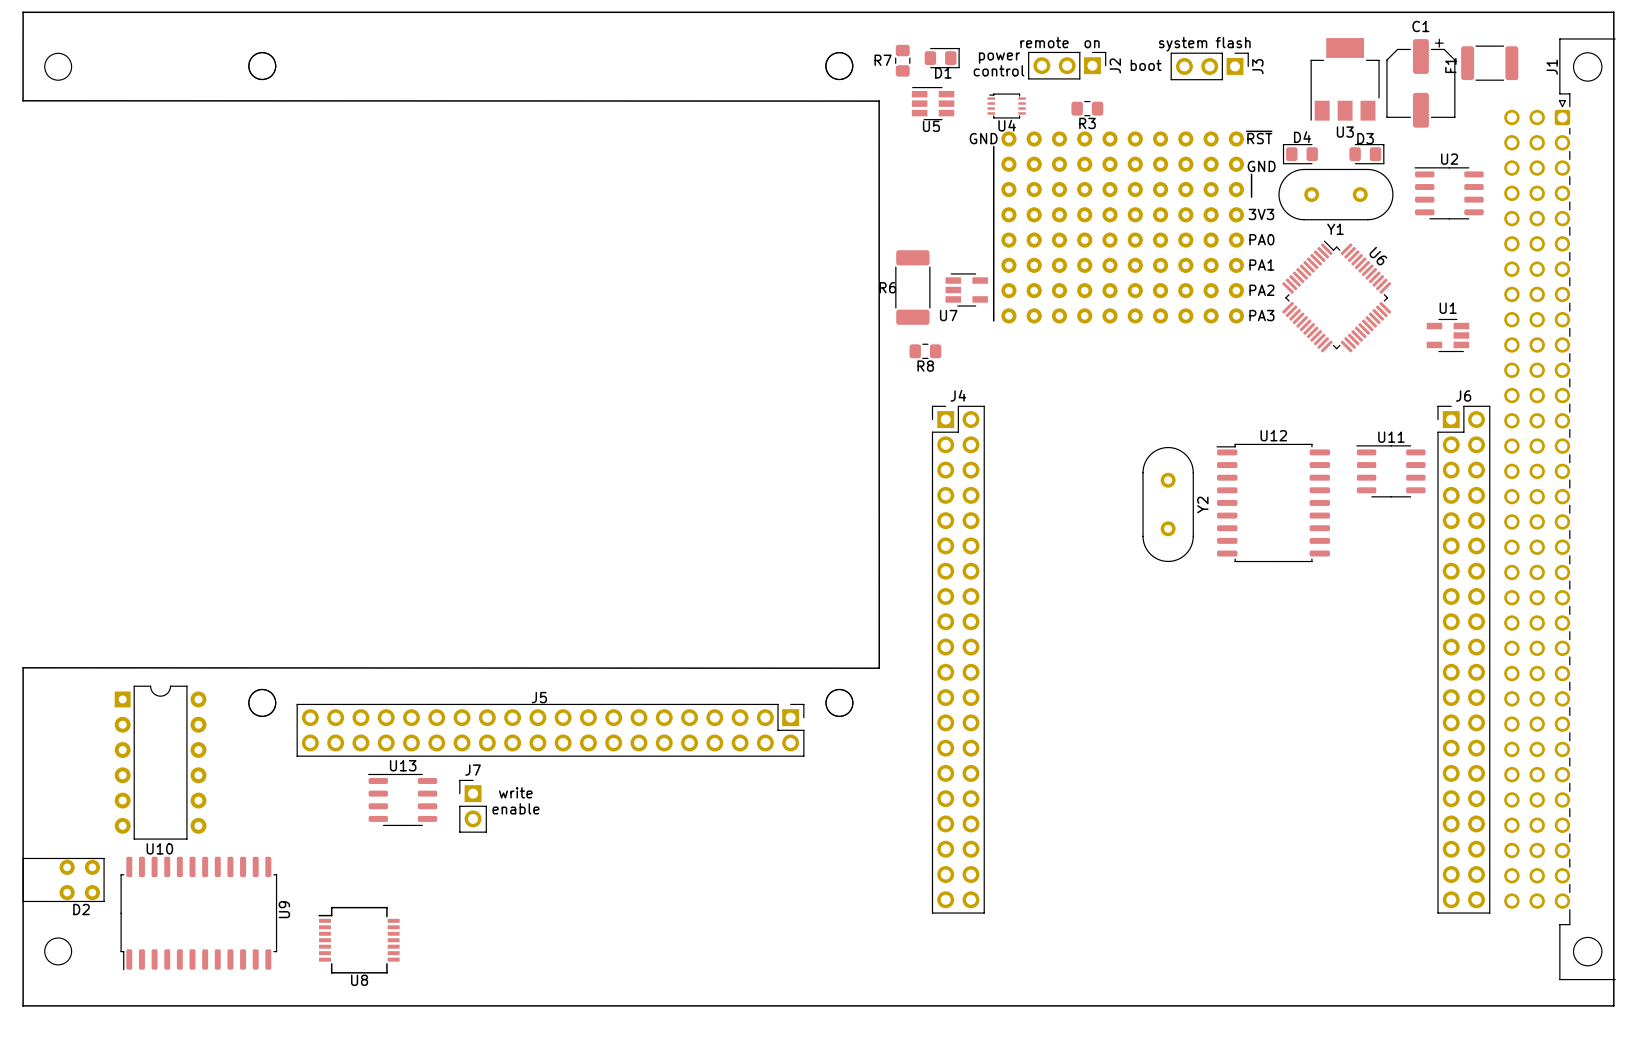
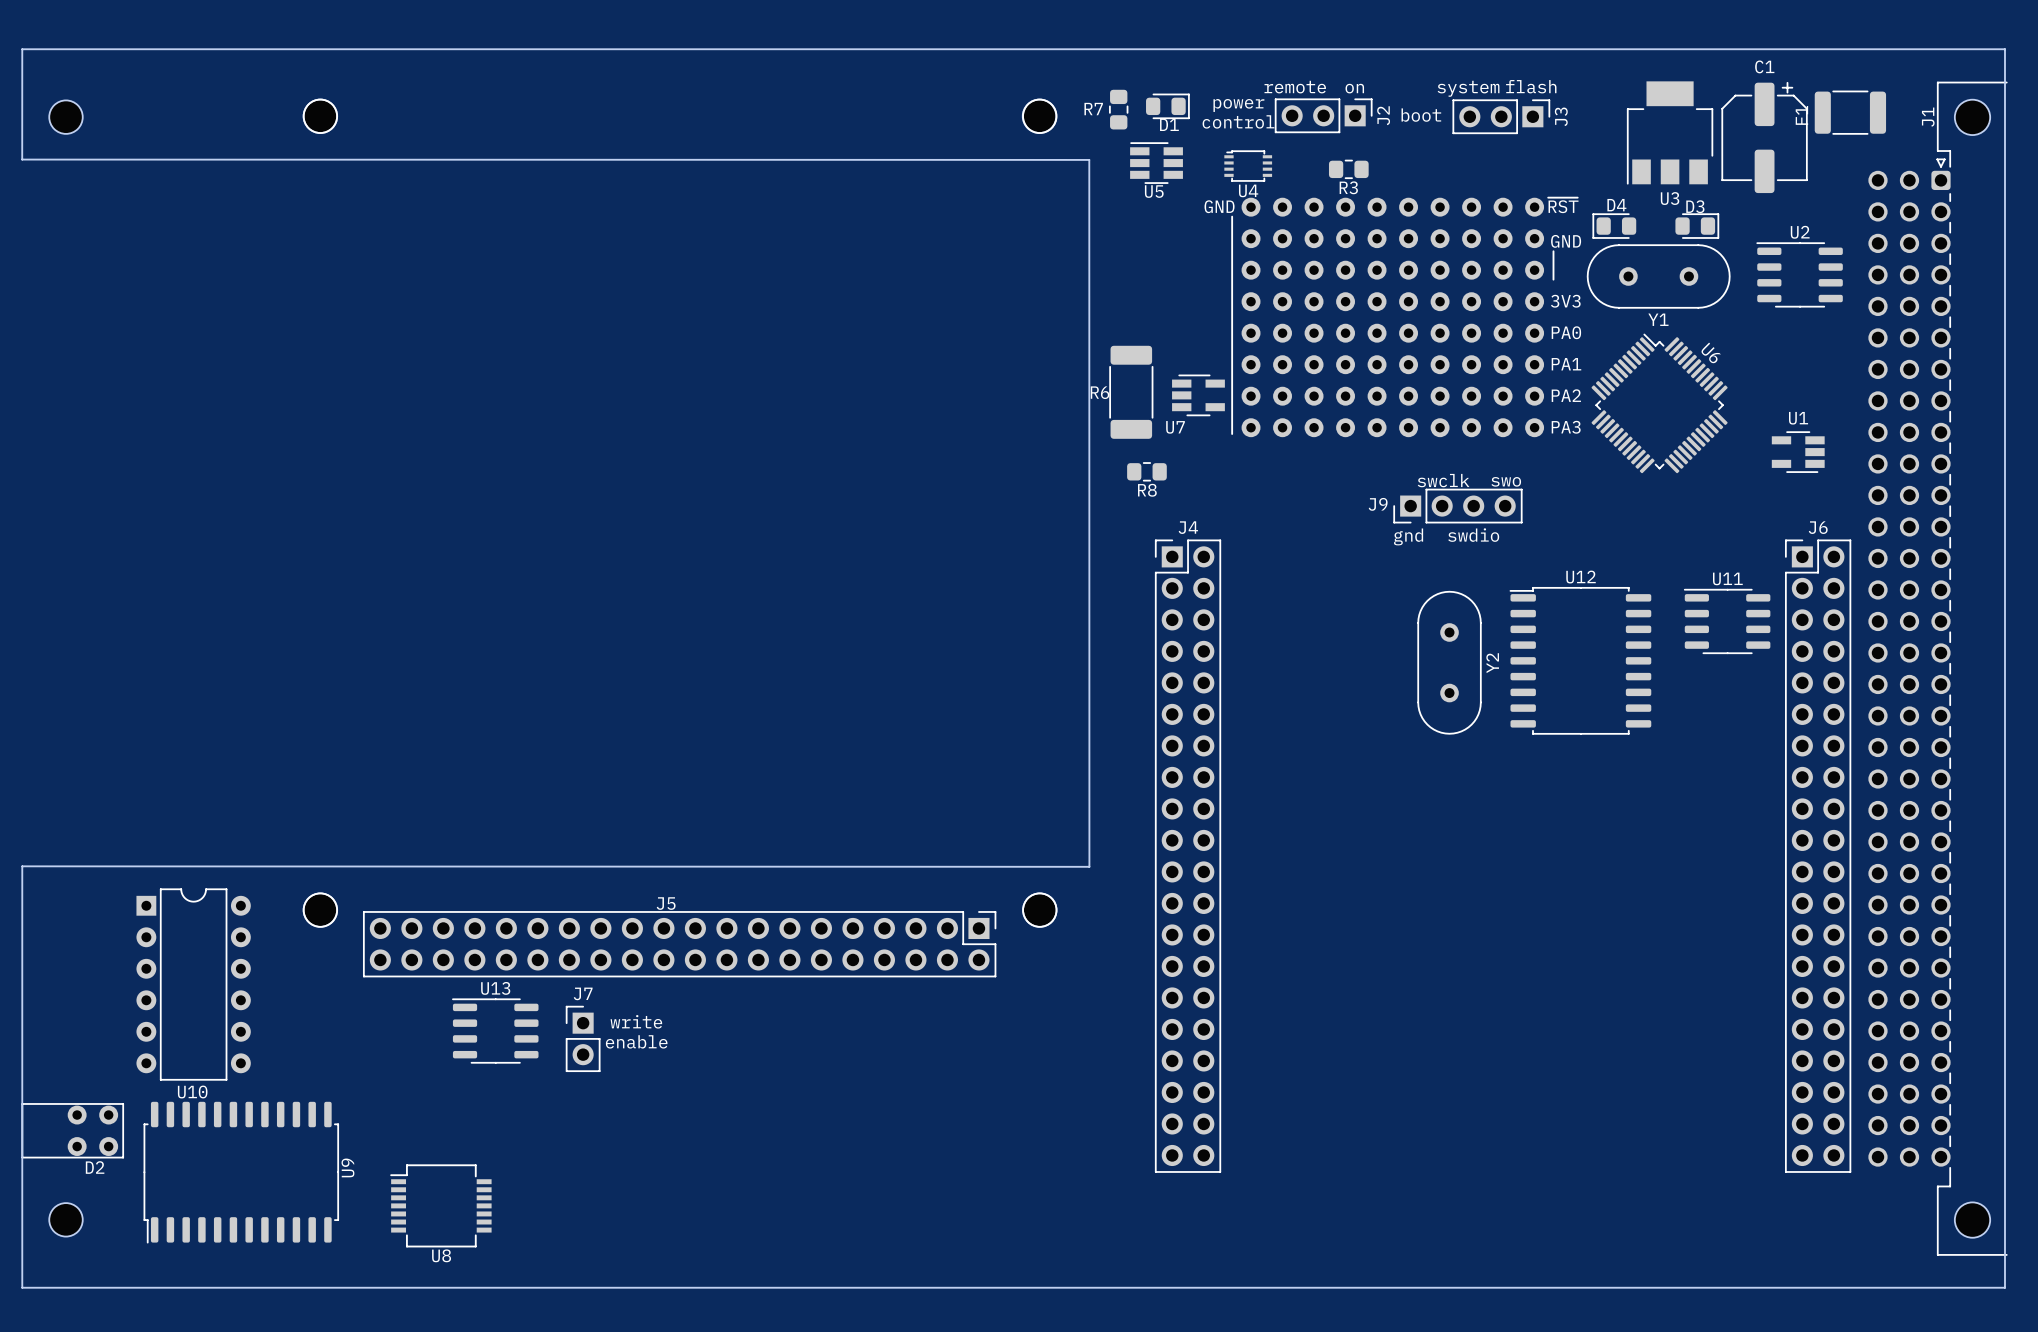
text: none -> swclk (1443, 480)
text: none -> swo (1506, 481)
J9: none -> (1457, 506)
text: none -> swdio (1473, 535)
text: none -> gnd (1408, 536)

